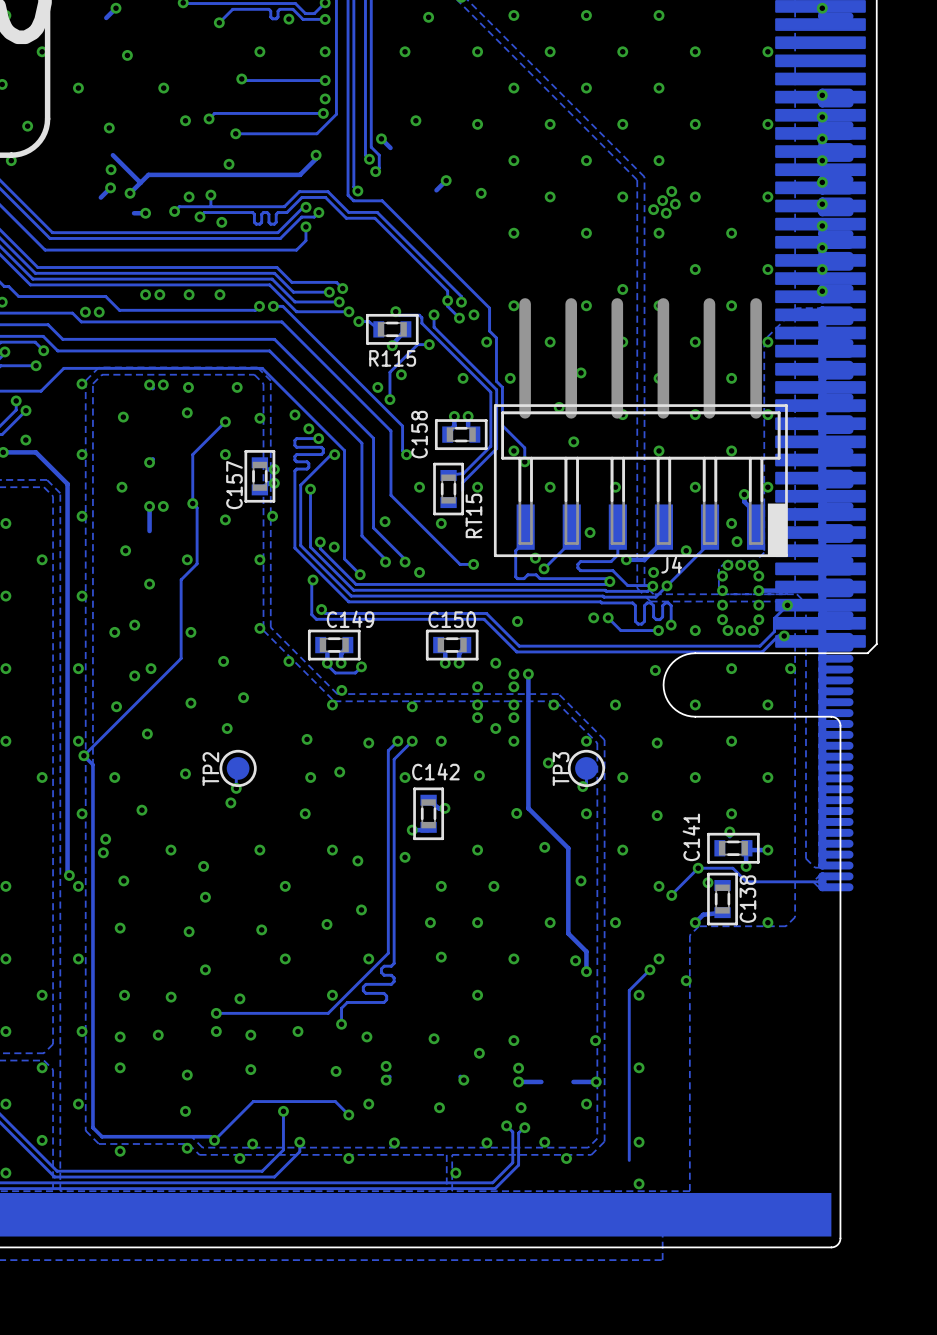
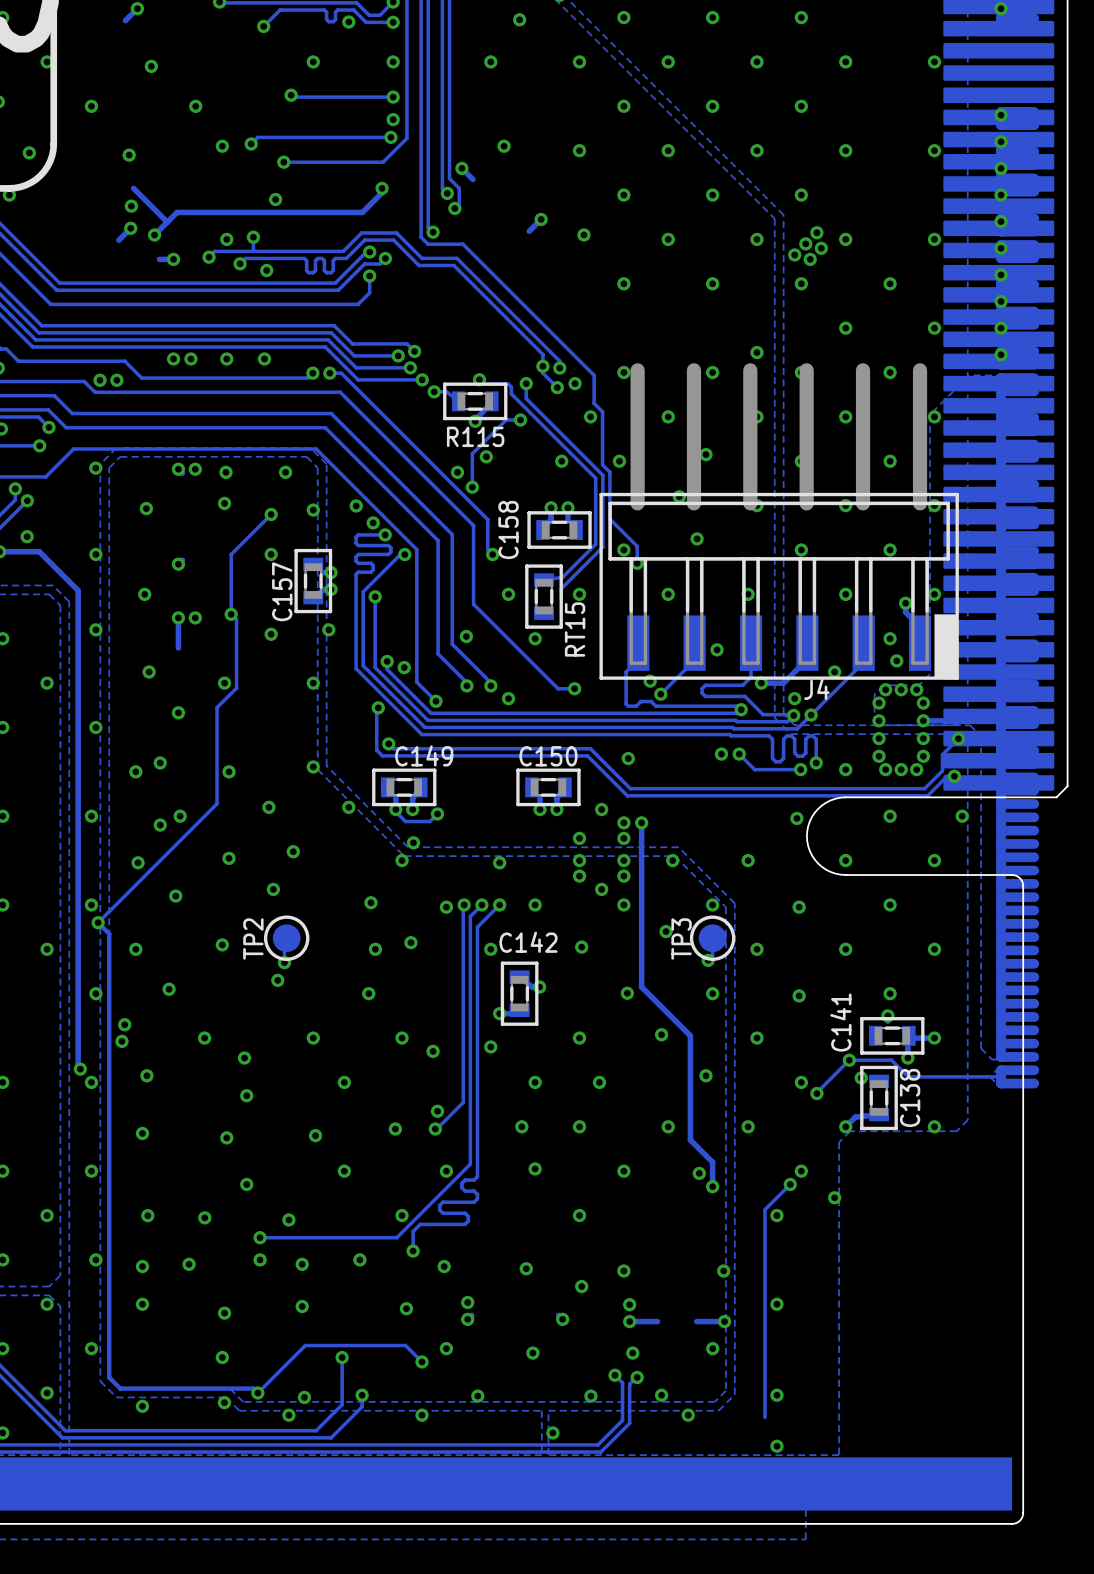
track: none -> (464, 904) (463, 1102) (435, 1129)
via: none -> (464, 904)
via: none -> (435, 1129)

